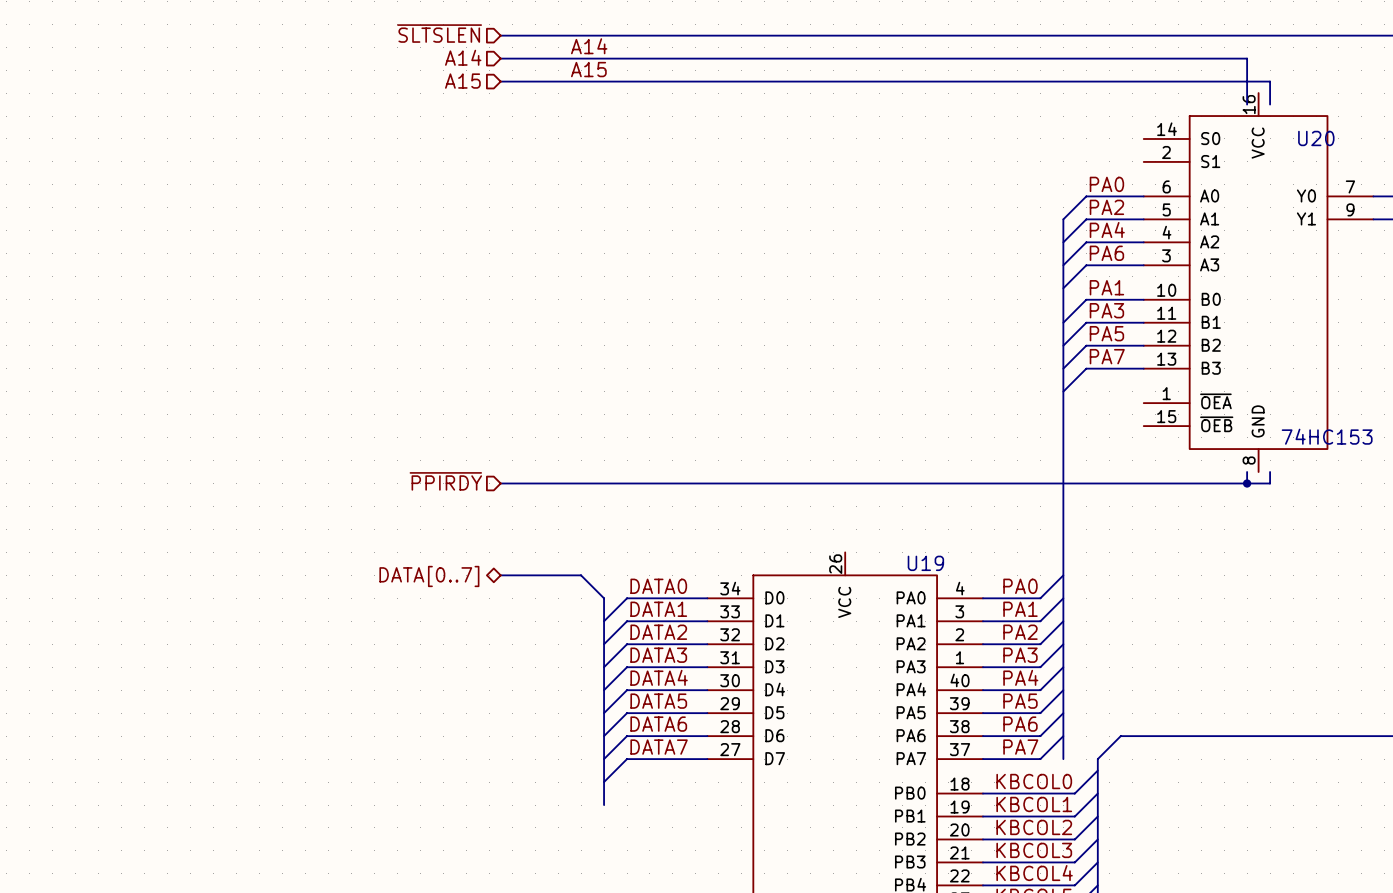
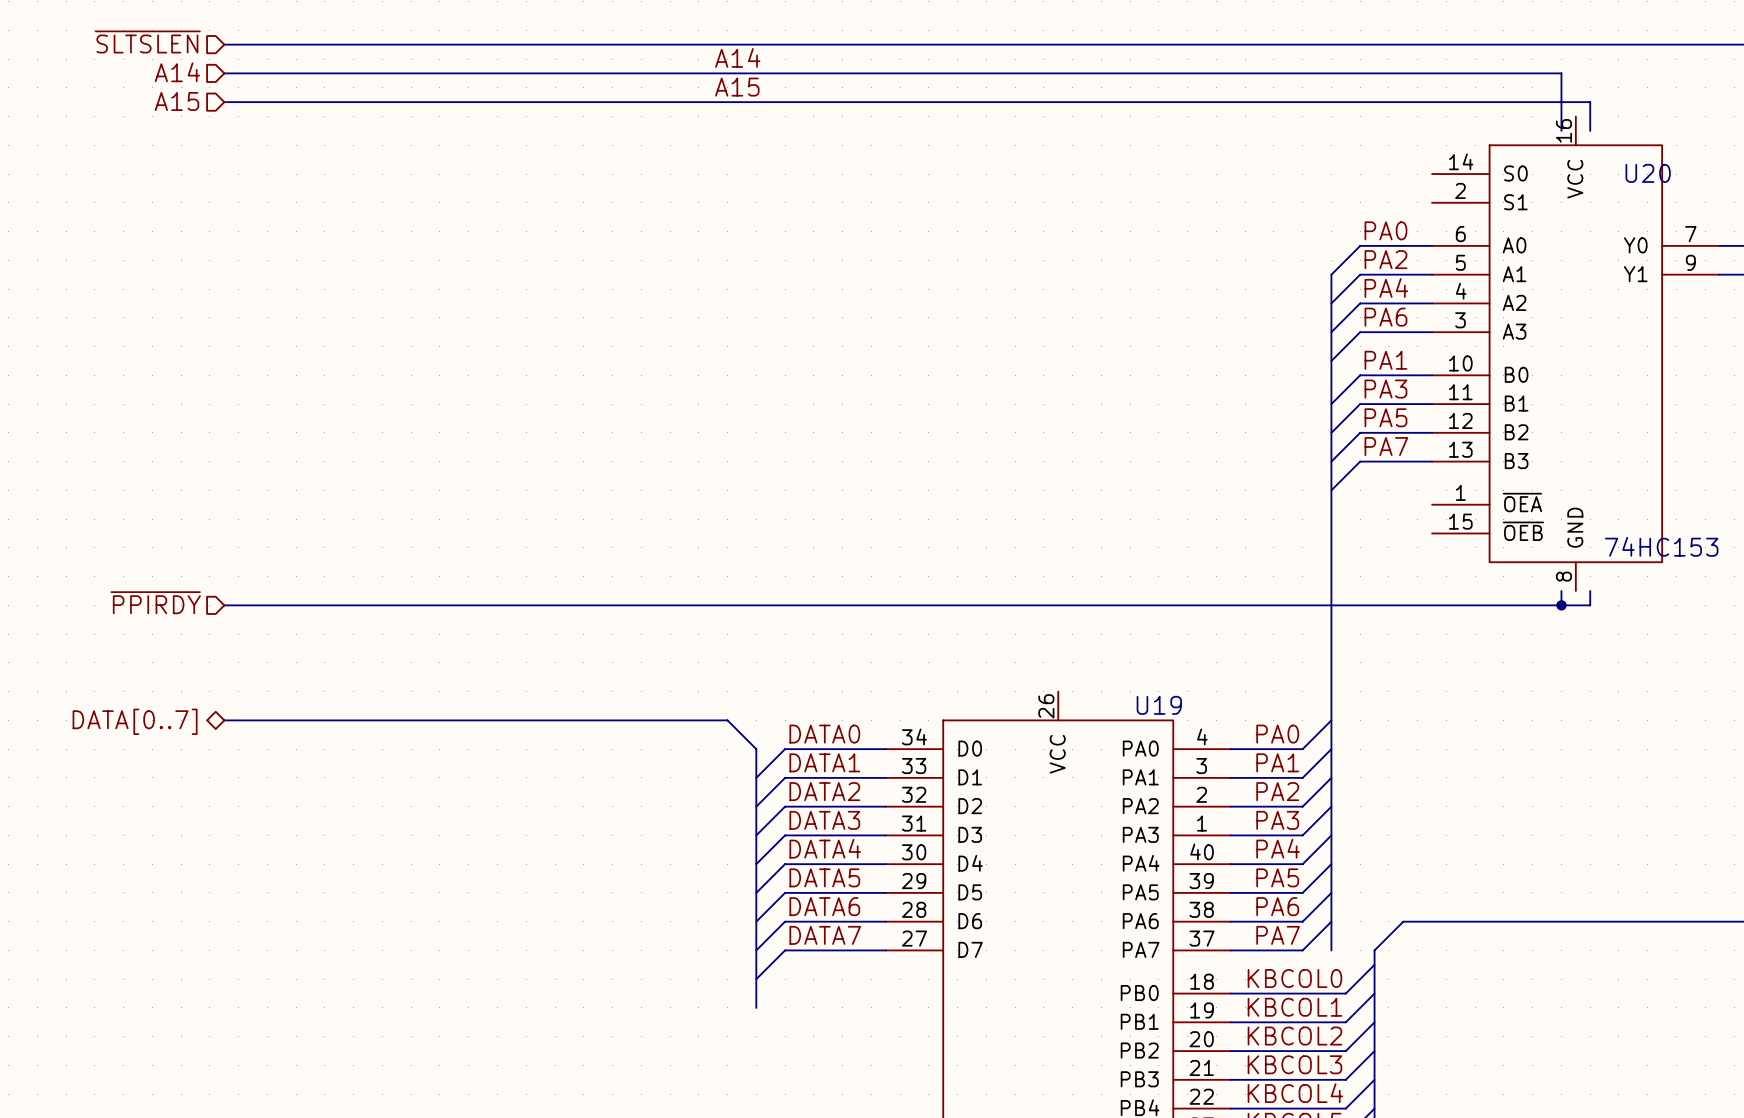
hierarchical label: none -> ~{SLTSLEN} (147, 42)
hierarchical label: ~{SLTSLEN} (439, 33) -> none
wire: none -> (224, 44) (626, 44)
hierarchical label: none -> A14 (177, 72)
hierarchical label: A14 (463, 57) -> none
wire: none -> (224, 73) (626, 73)
hierarchical label: none -> A15 (176, 101)
wire: none -> (224, 102) (626, 102)
hierarchical label: A15 (462, 81) -> none
hierarchical label: none -> ~{PPIRDY} (155, 602)
hierarchical label: ~{PPIRDY} (445, 481) -> none
wire: none -> (224, 605) (626, 605)
bus: none -> (224, 720) (626, 720)
hierarchical label: none -> DATA[0..7] (135, 721)
hierarchical label: DATA[0..7] (429, 576) -> none

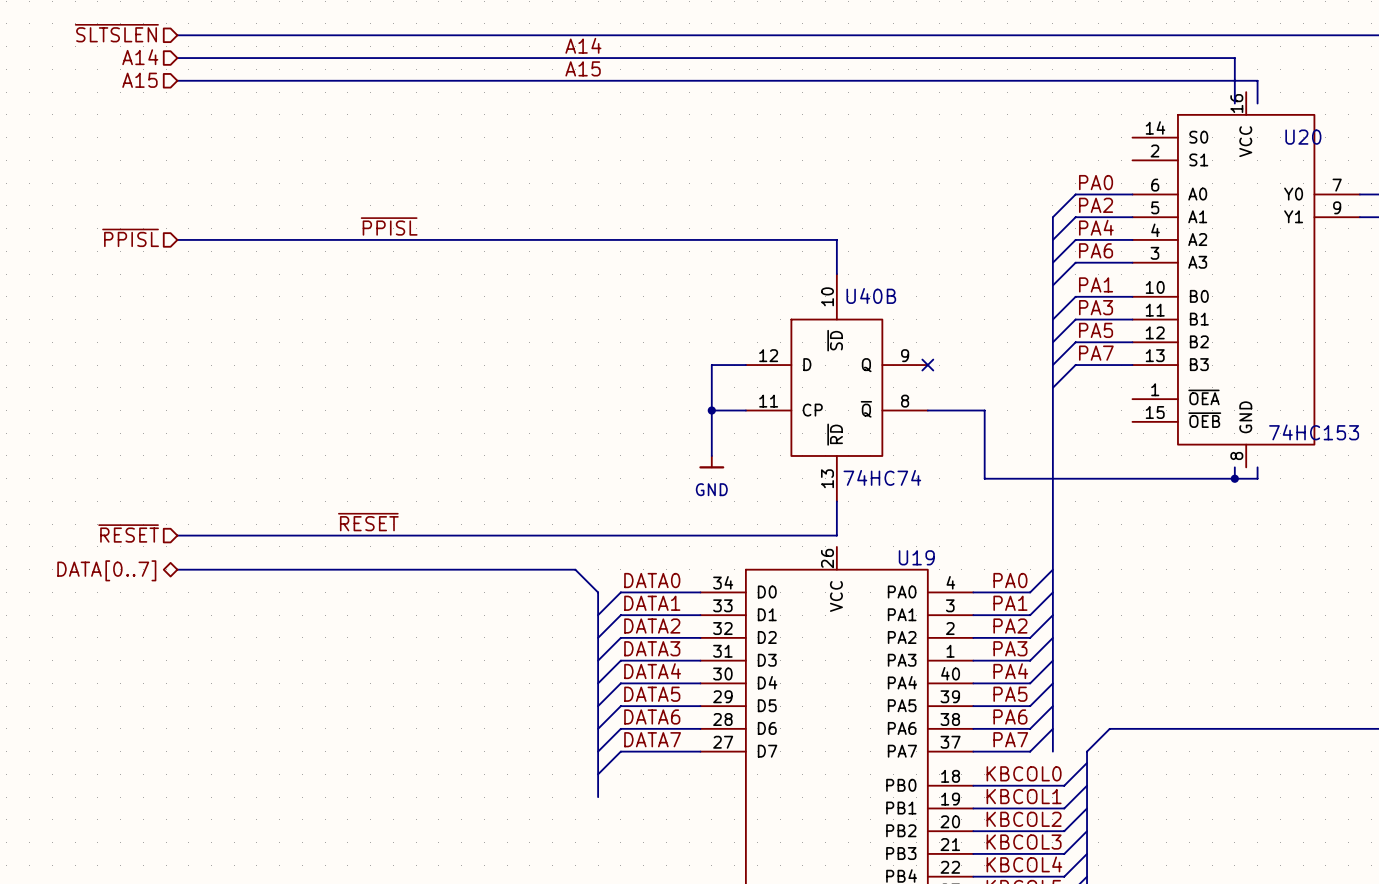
label: none -> ~{PPISL} (389, 226)
hierarchical label: none -> ~{PPISL} (130, 237)
wire: none -> (177, 239) (836, 239) (836, 274)
wire: none -> (745, 365) (711, 365) (711, 455)
no-connect mark: none -> (927, 365)
U40B: none -> 74HC74 (836, 387)
wire: none -> (711, 410) (745, 410)
junction: none -> (711, 410)
power symbol: none -> GND (711, 462)
hierarchical label: ~{PPIRDY} (155, 602) -> none
wire: (224, 605) (1245, 605) -> (927, 410) (984, 410) (984, 478)
wire: none -> (836, 501) (836, 535) (177, 535)
label: none -> ~{RESET} (368, 522)
hierarchical label: none -> ~{RESET} (128, 533)

